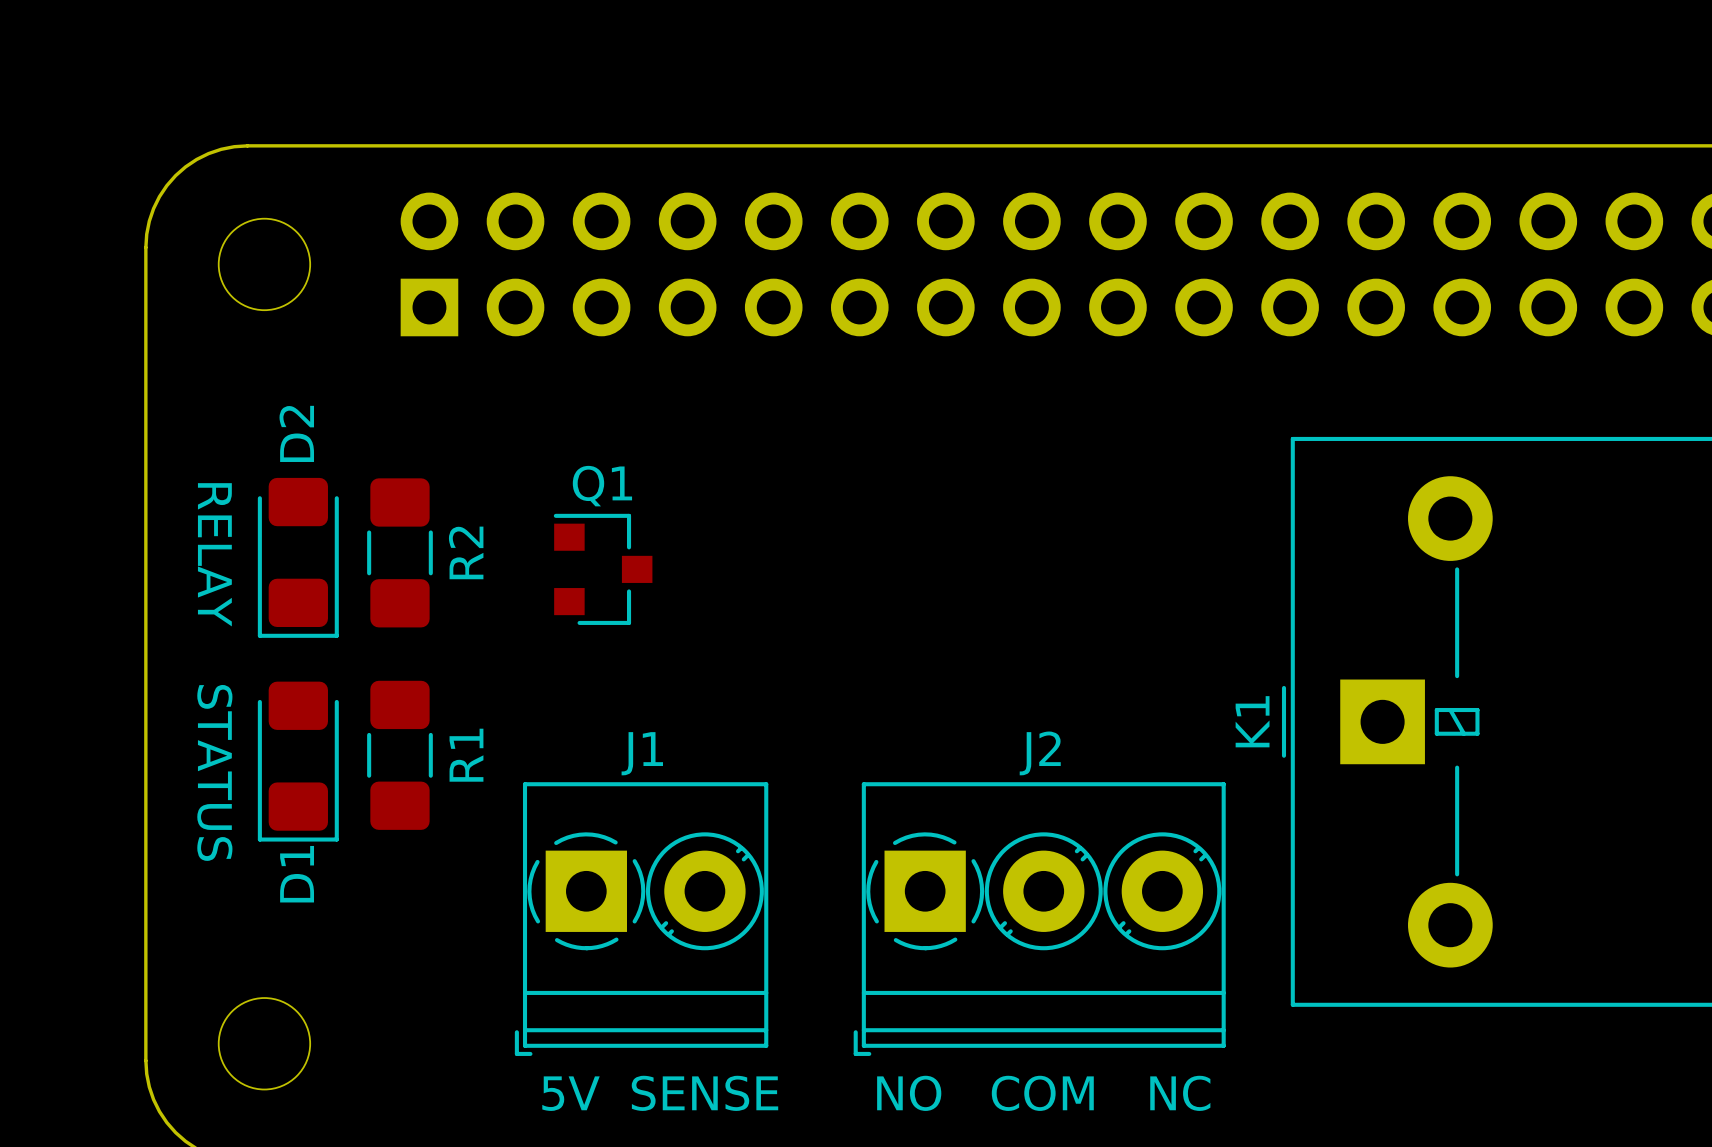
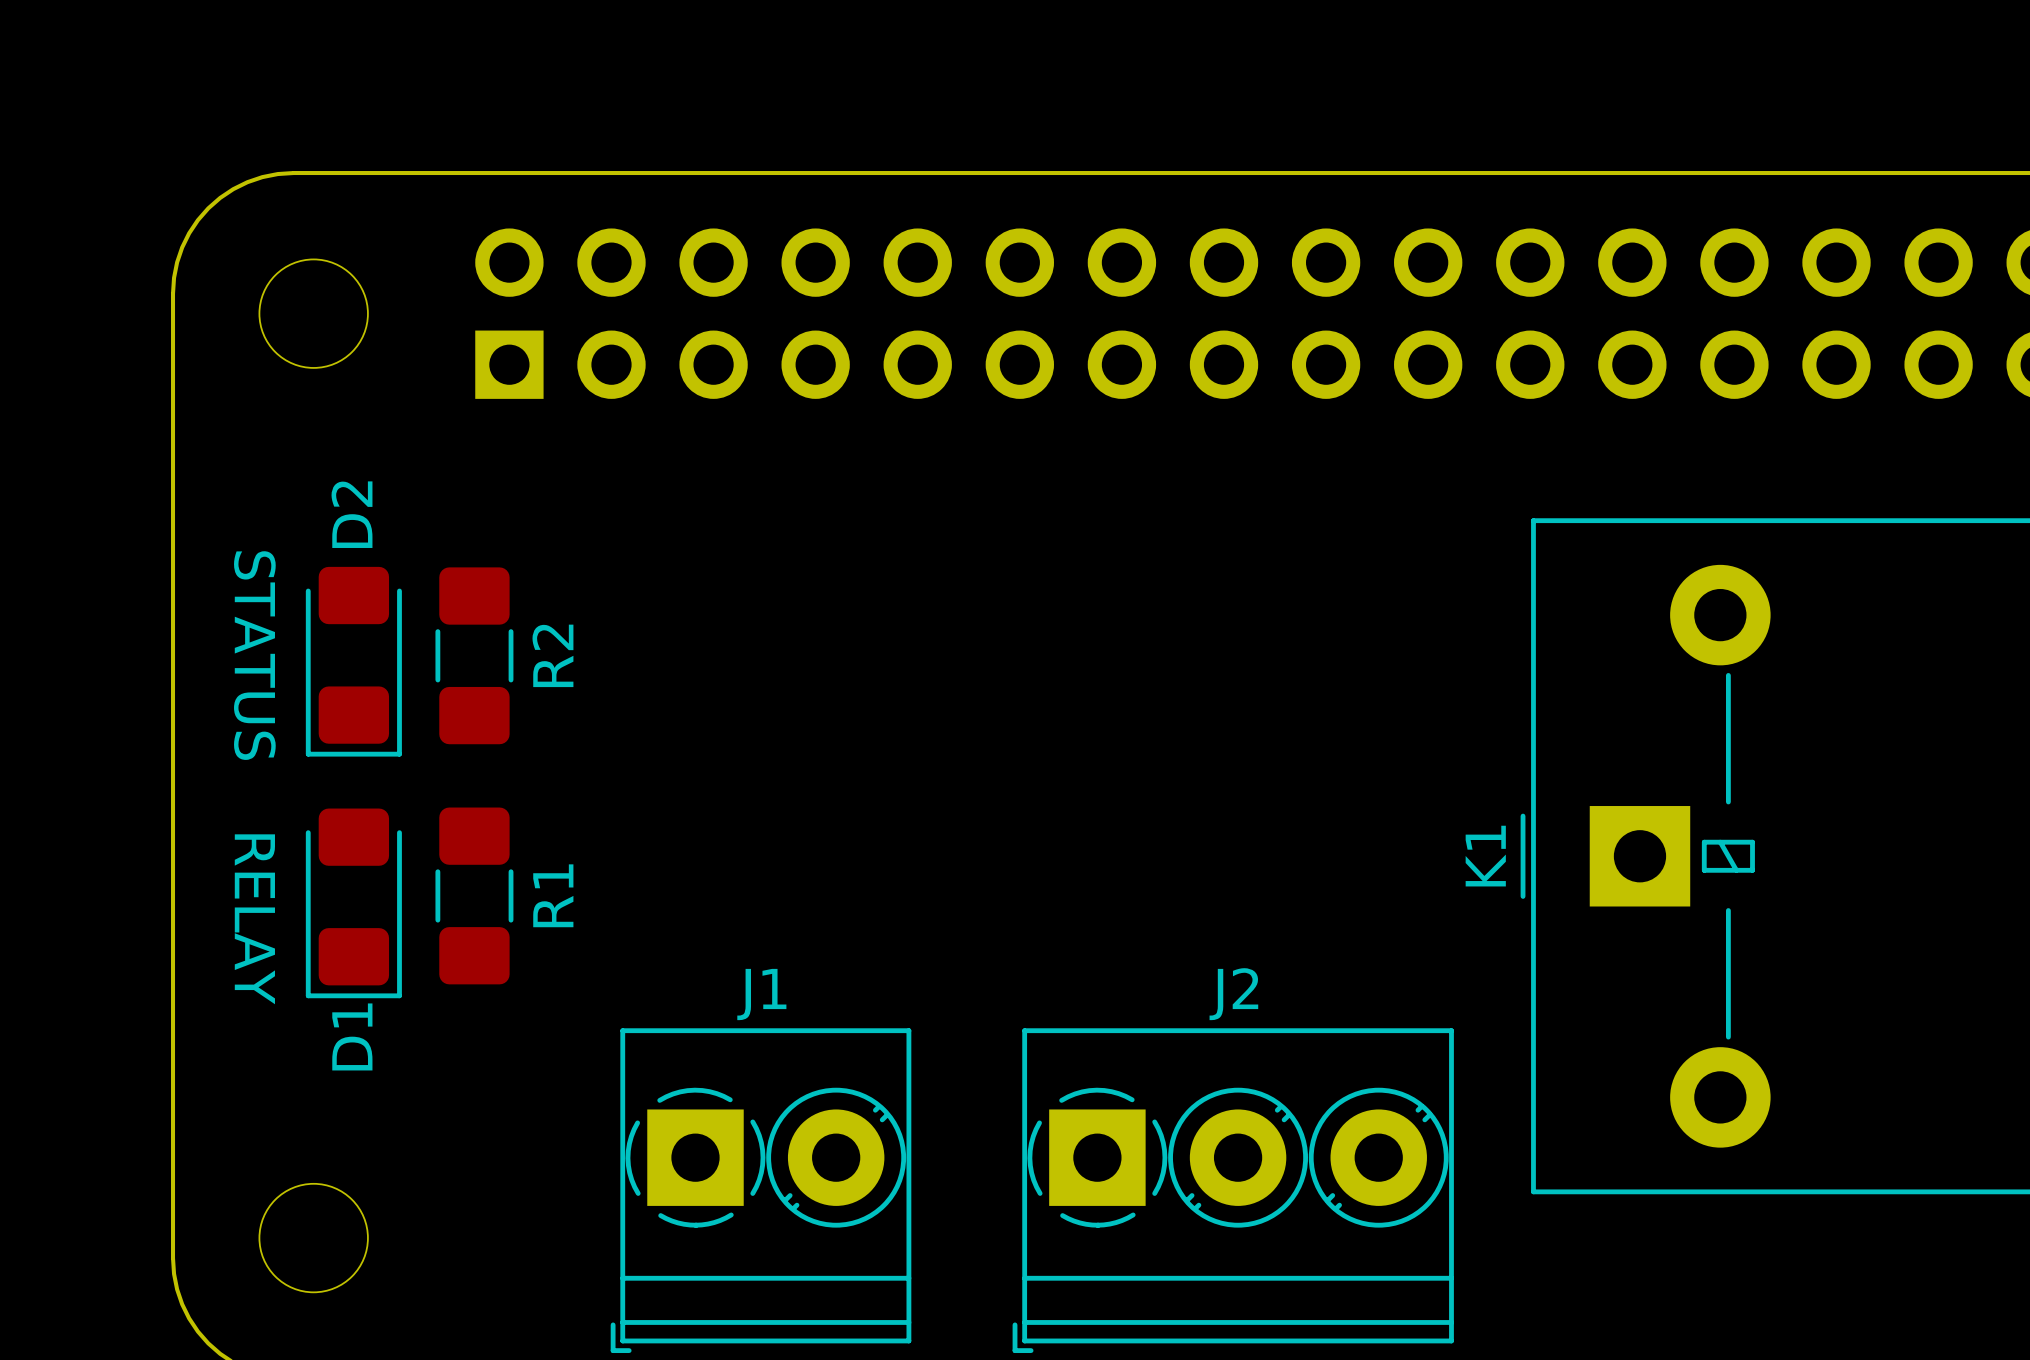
text: RELAY (214, 554) -> STATUS (254, 655)
Q1: (603, 569) -> none
text: STATUS (214, 772) -> RELAY (254, 919)
J1 position: (641, 919) -> (761, 1190)
J2 position: (1039, 919) -> (1233, 1190)
text: 5V (571, 1093) -> none
text: SENSE (704, 1093) -> none
text: NO (909, 1093) -> none
text: COM (1042, 1093) -> none
text: NC (1180, 1093) -> none

